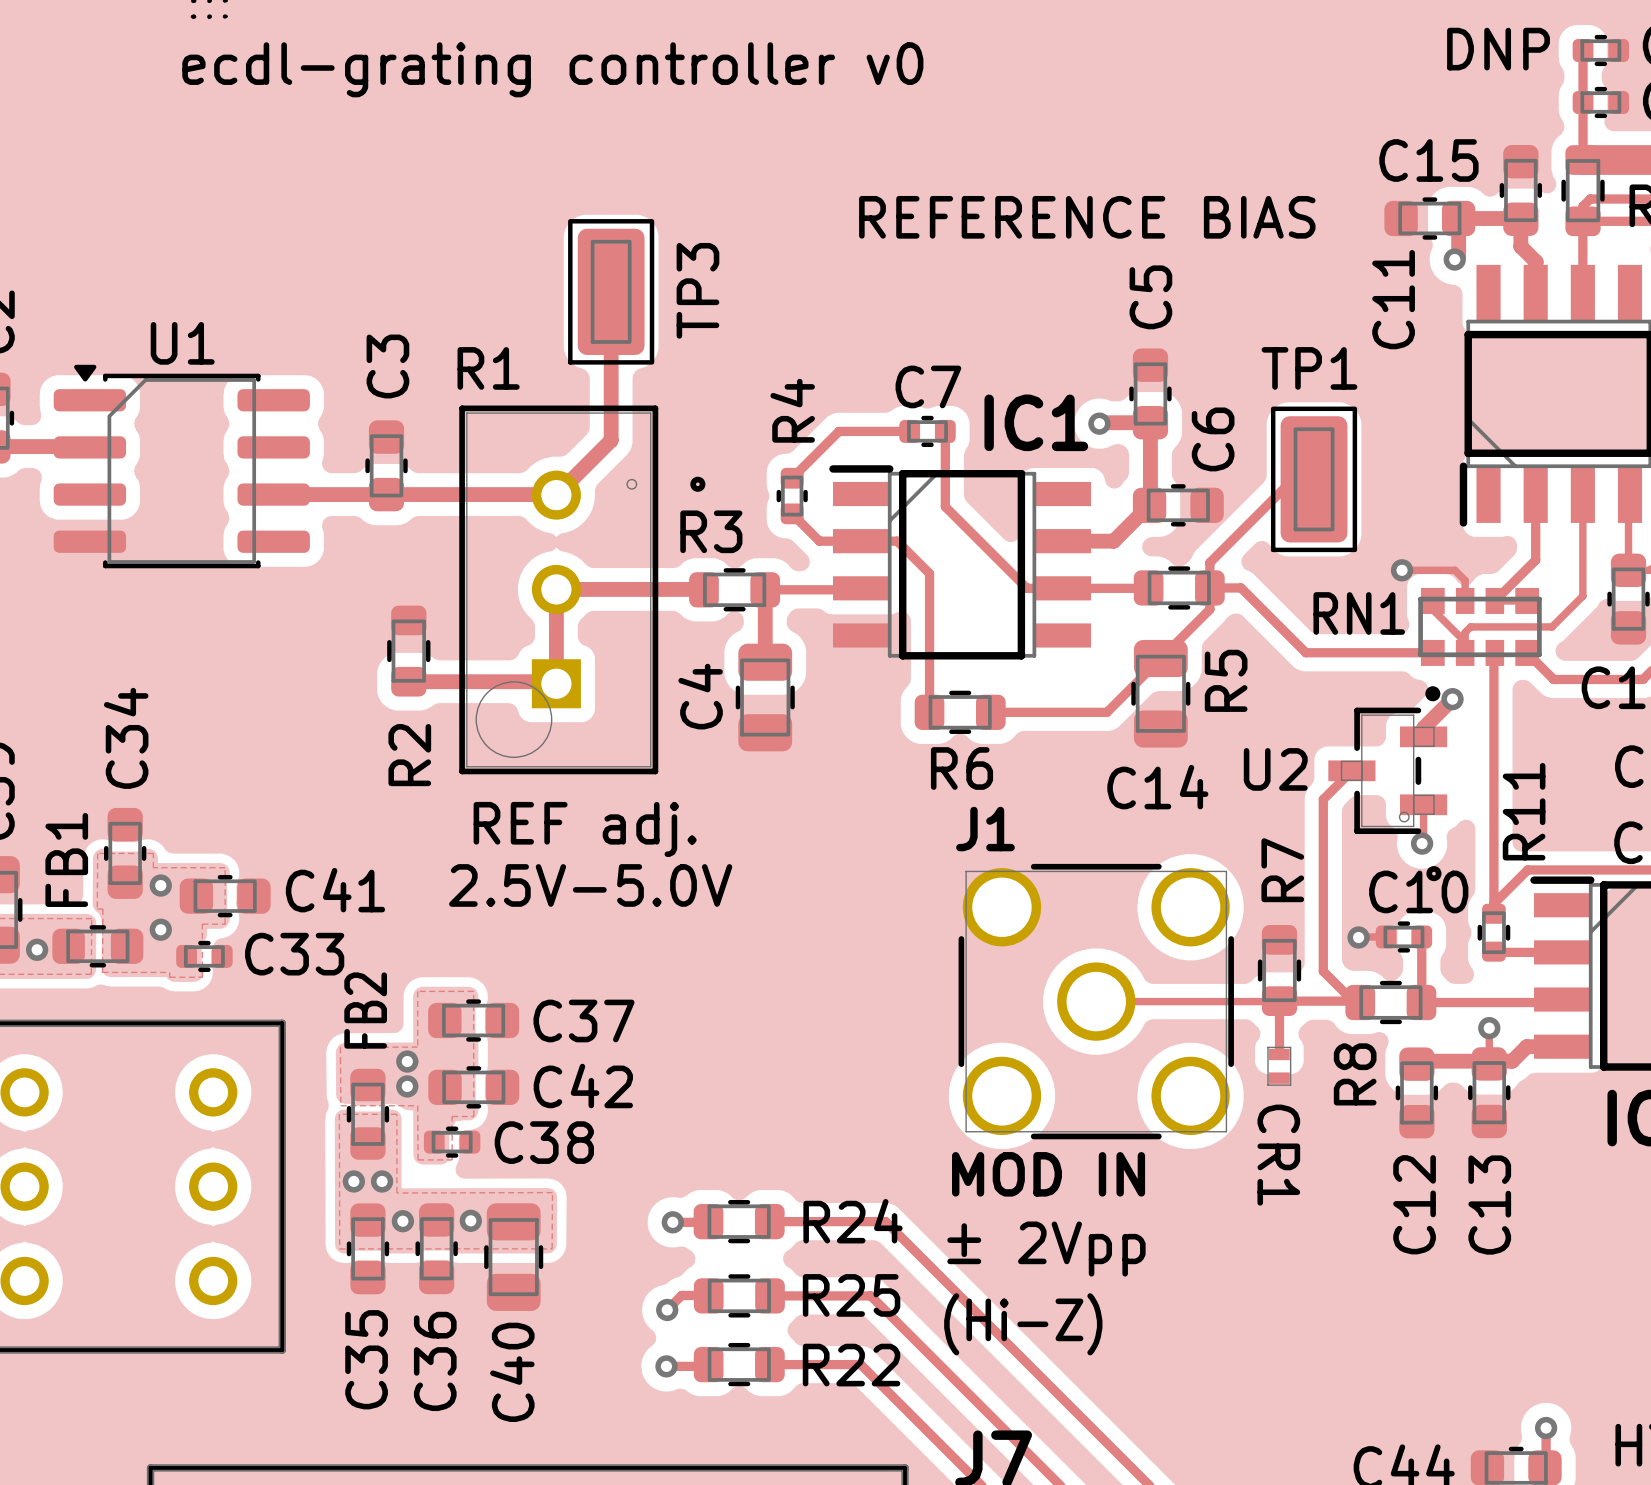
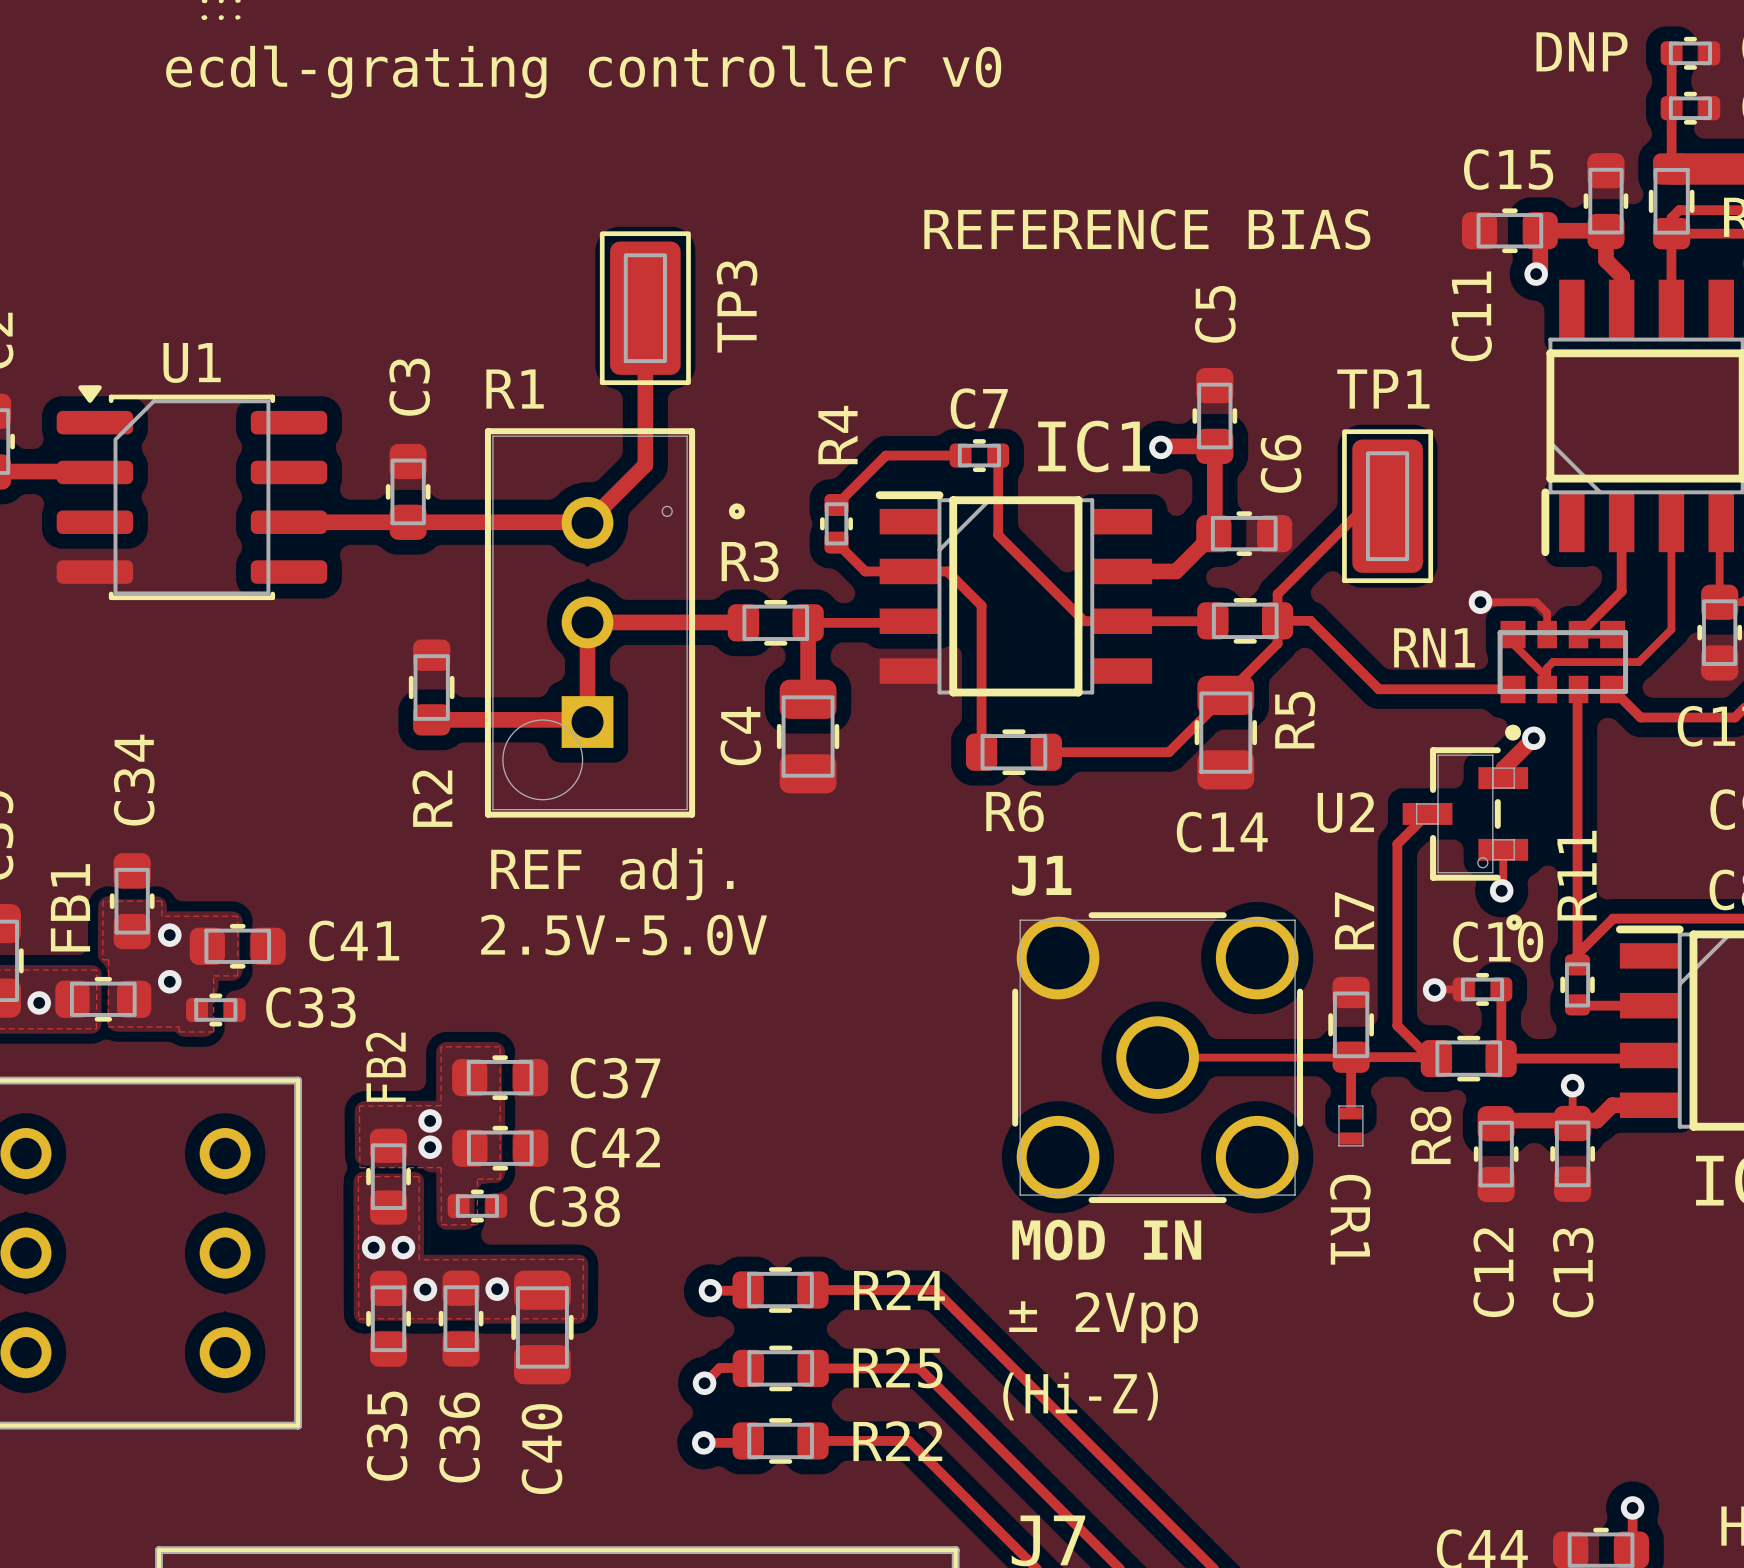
R11 name position: R11 (1524, 811) -> R11 (1577, 875)

